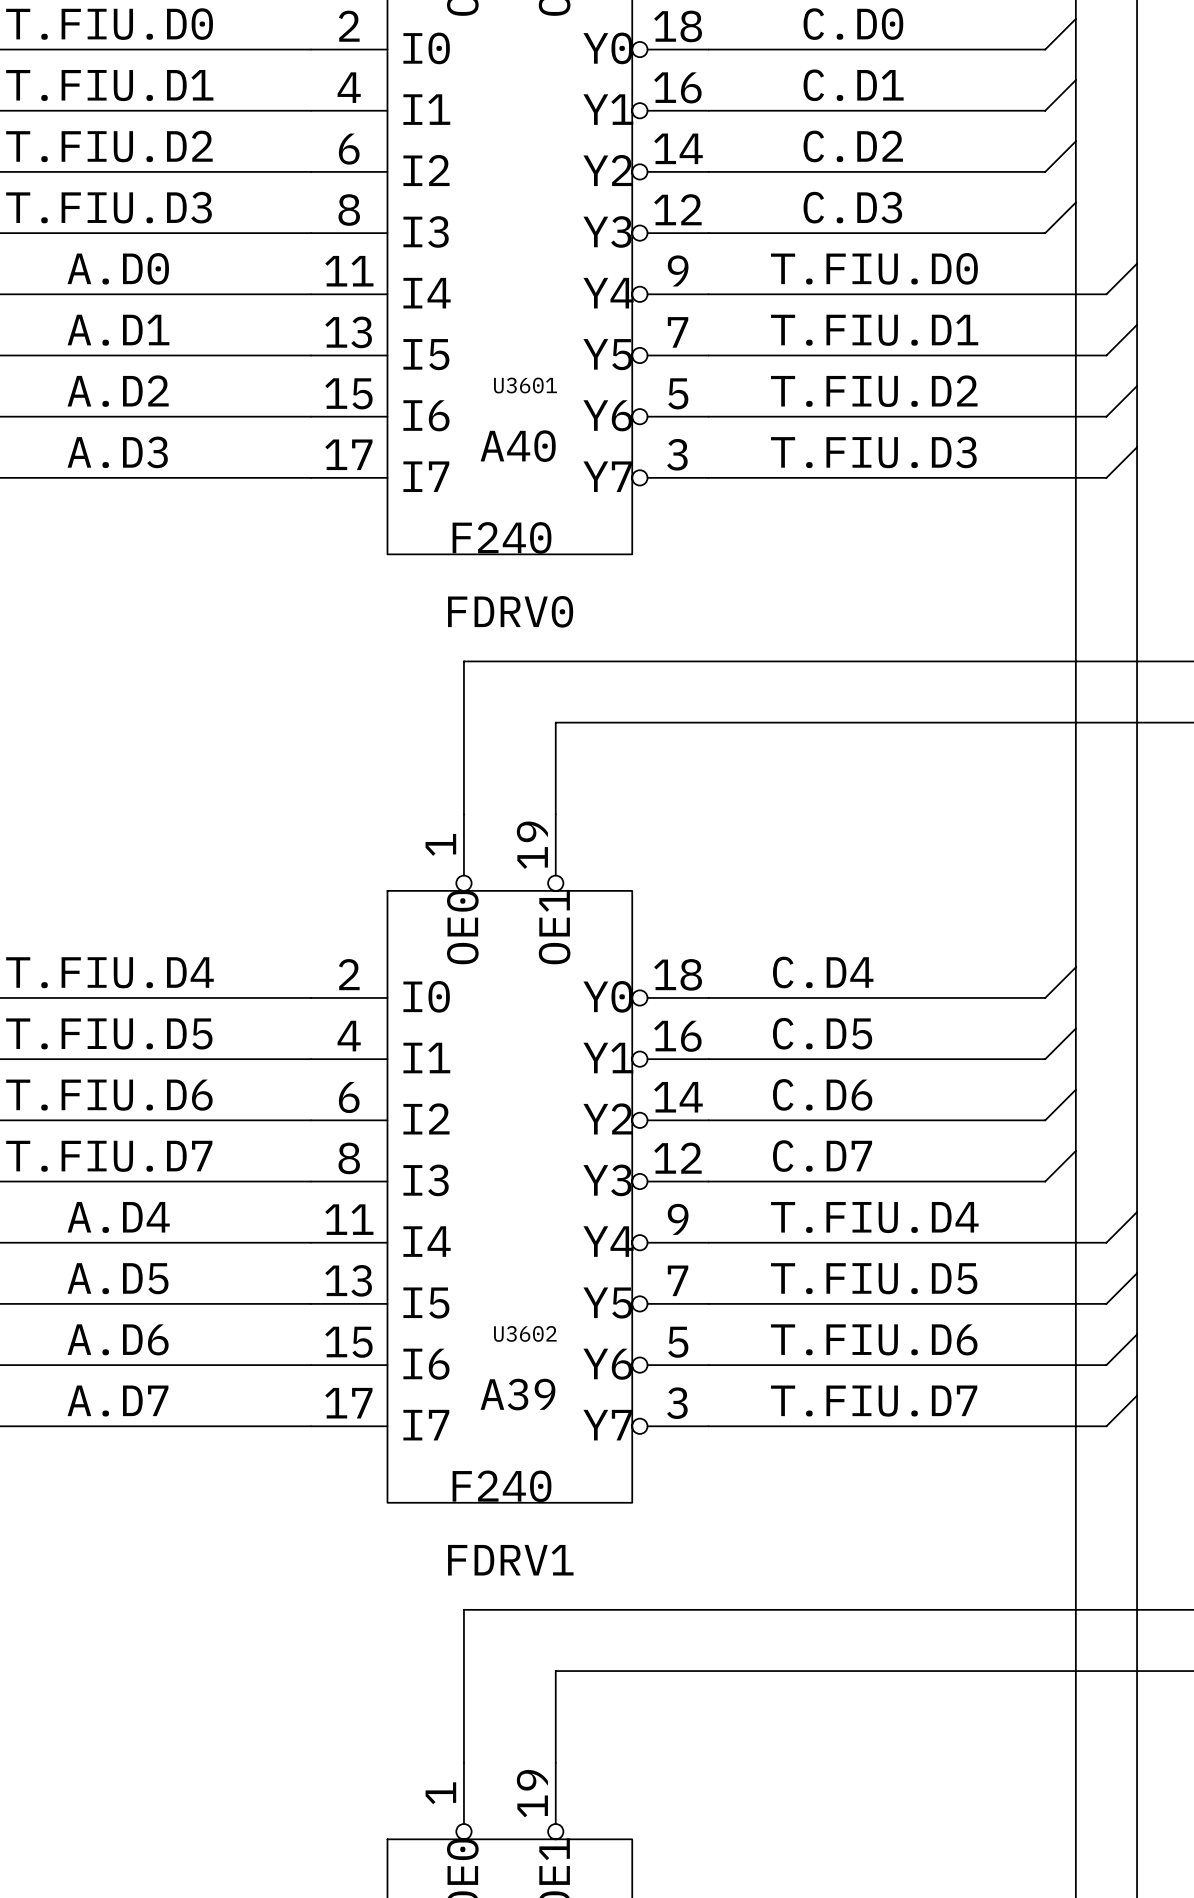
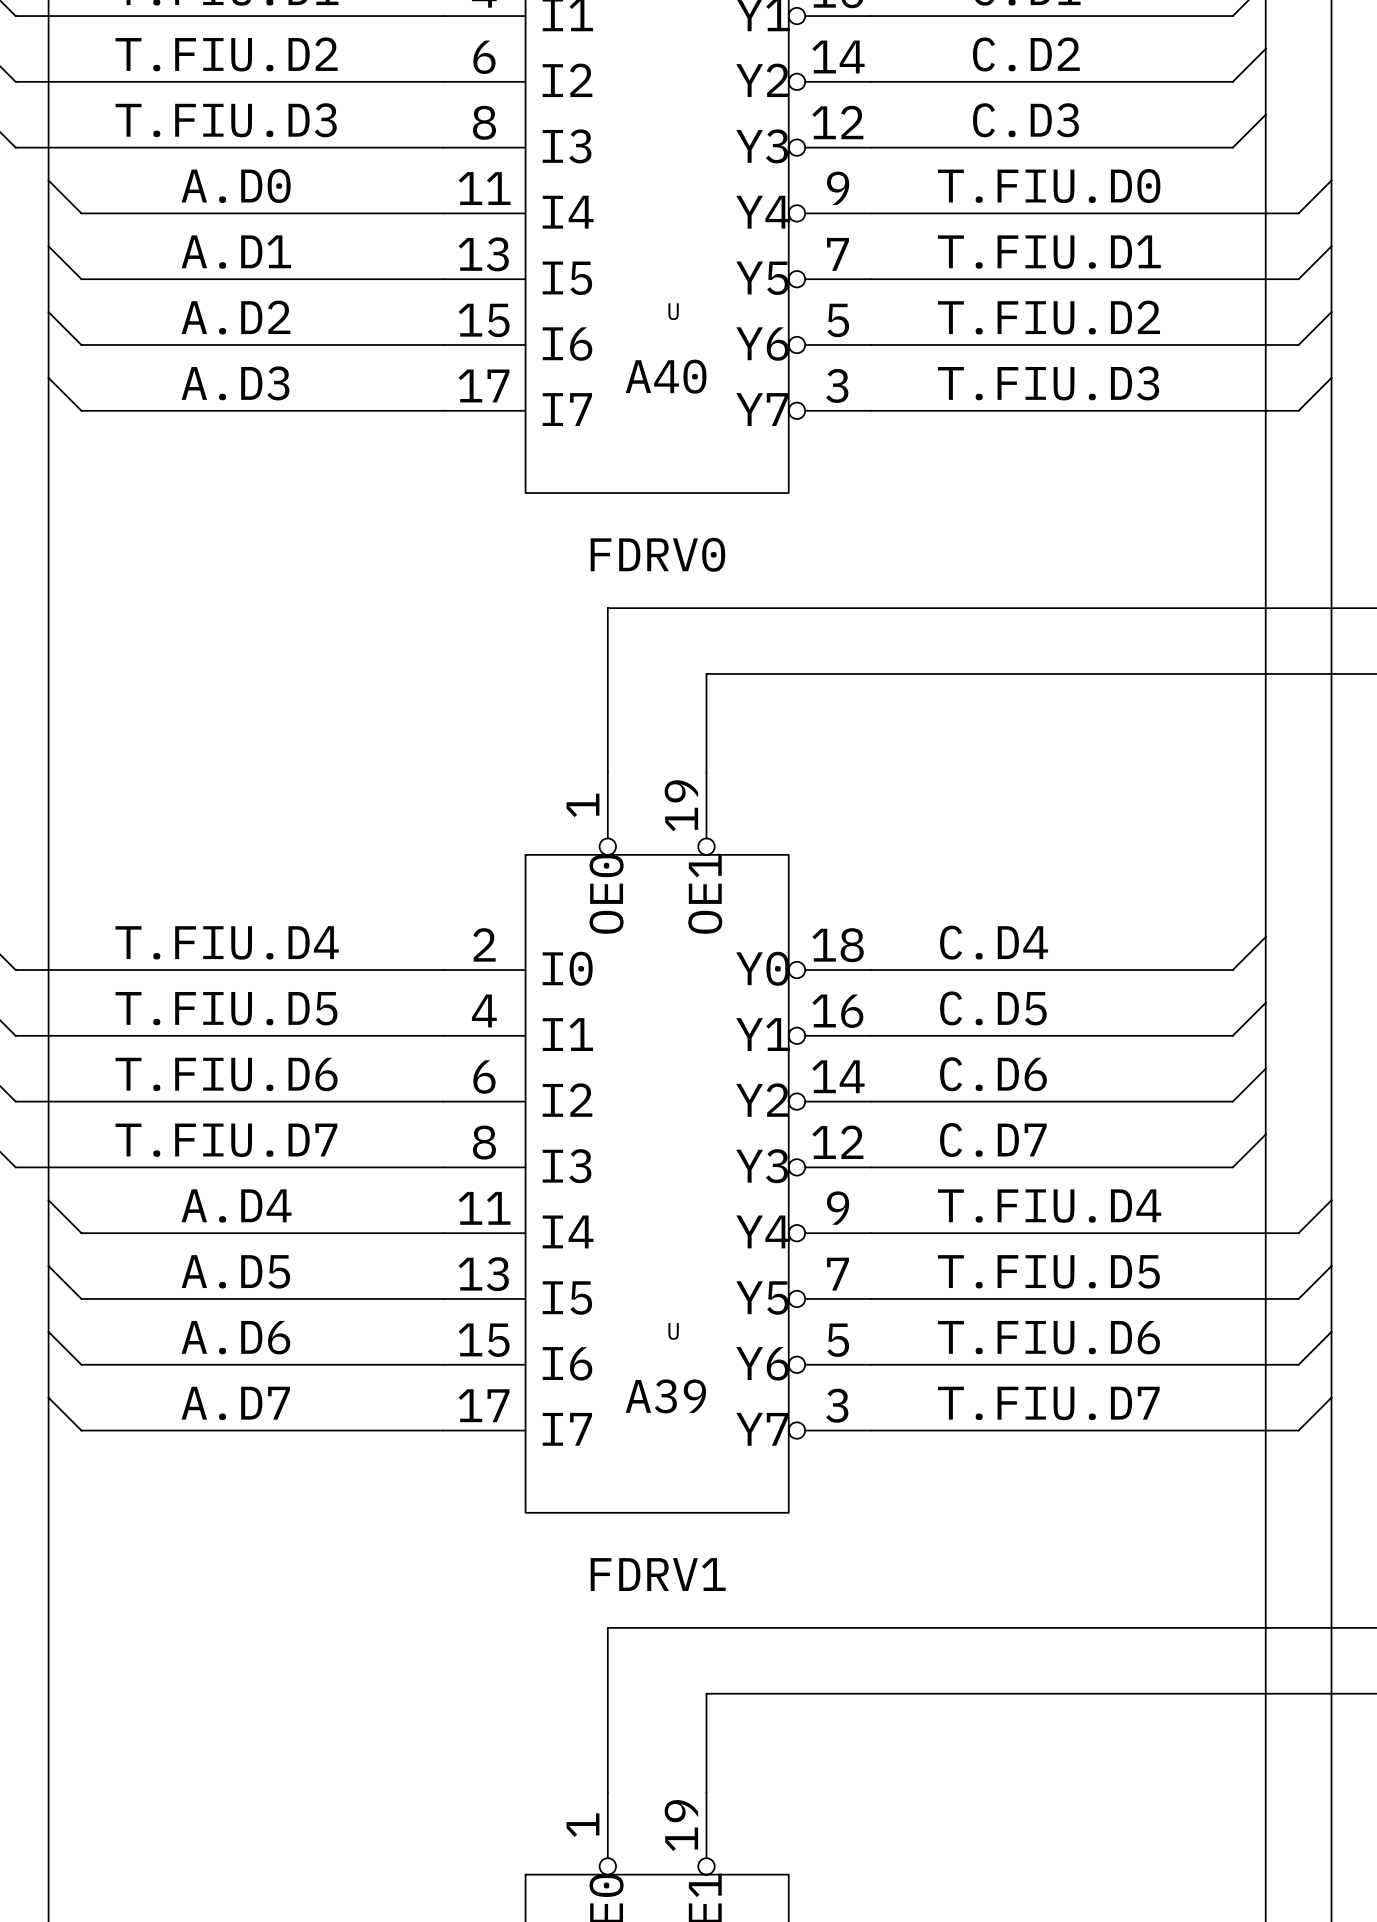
U3601 name: U3601 (525, 385) -> U (673, 311)
U3601 value: F240 (502, 537) -> none
U3602 name: U3602 (525, 1333) -> U (673, 1331)
U3602 value: F240 (502, 1486) -> none

